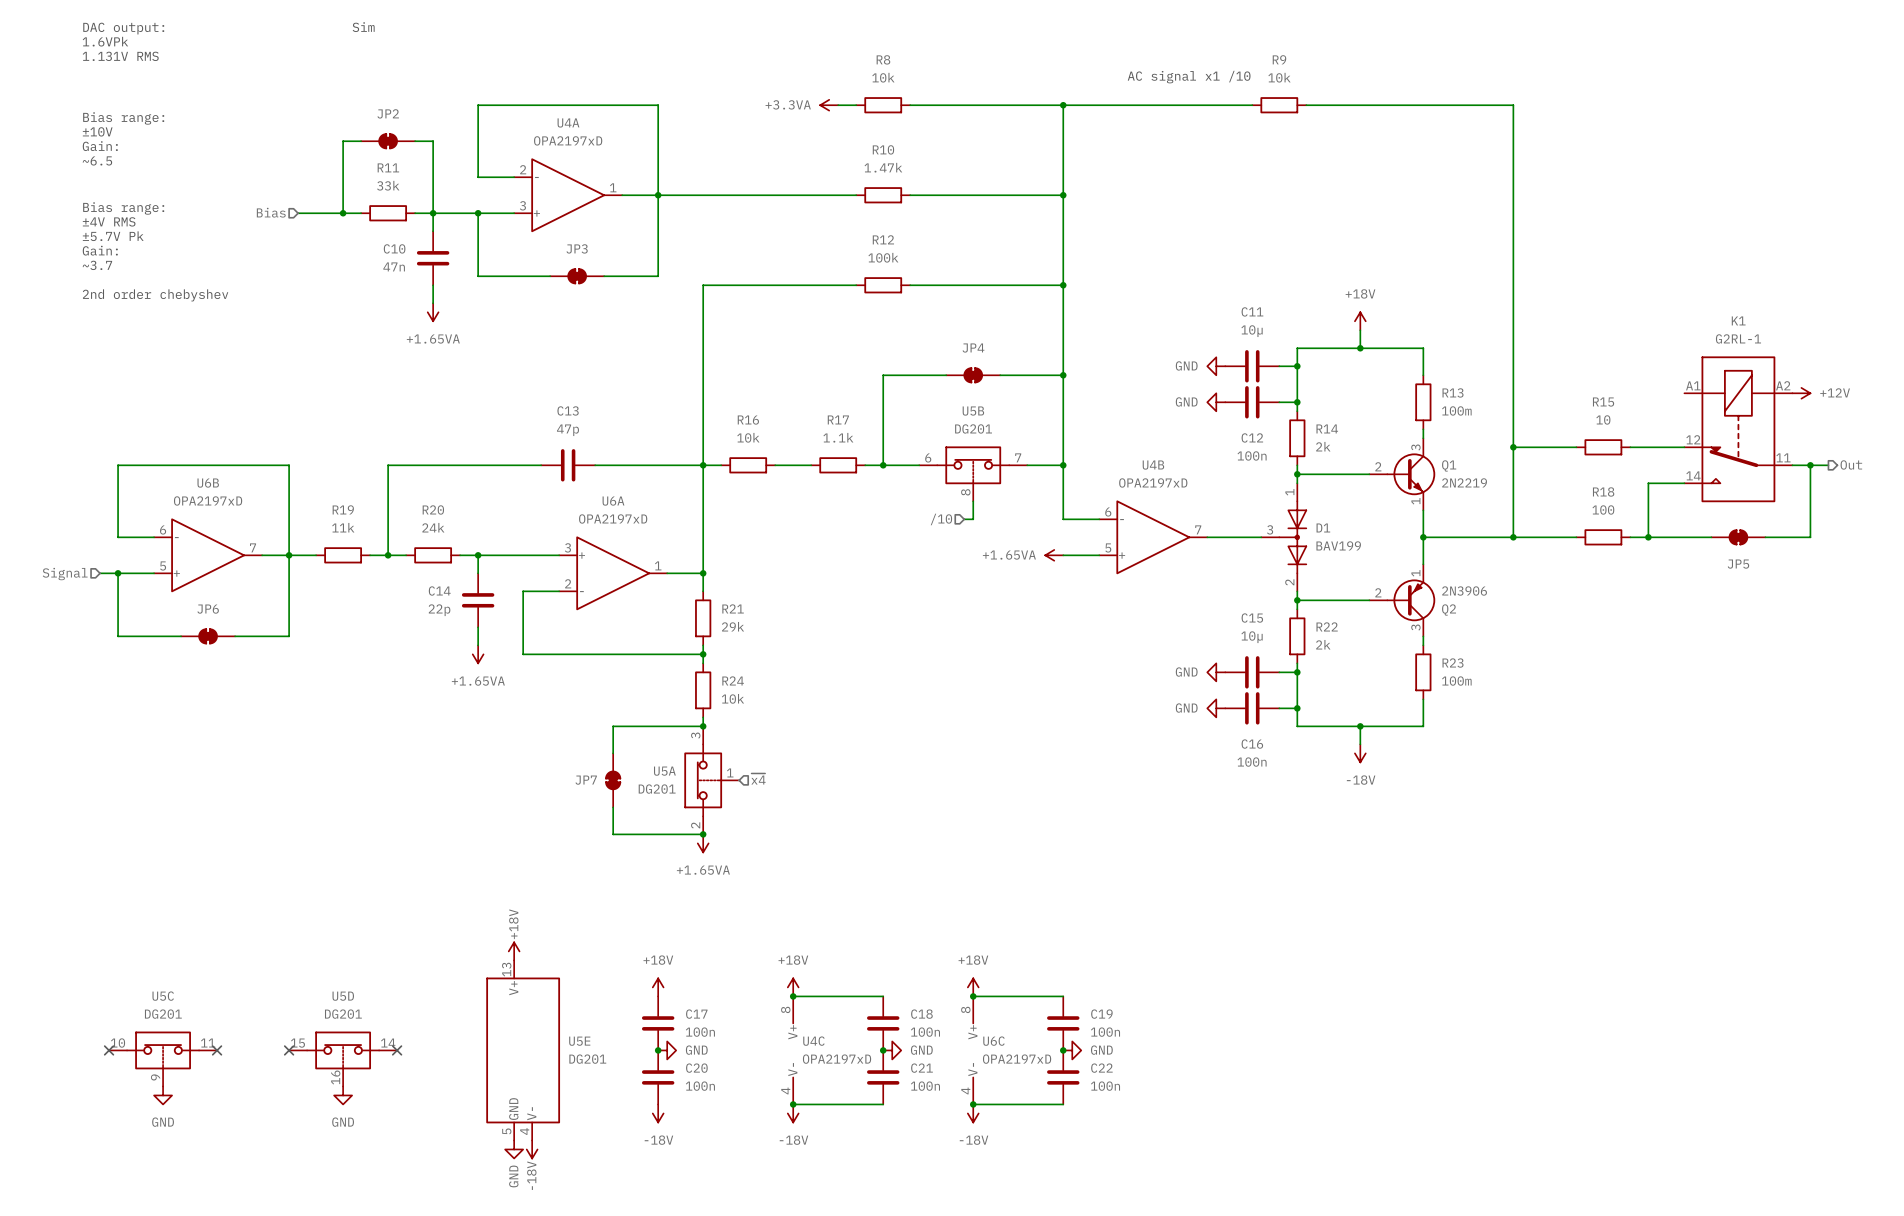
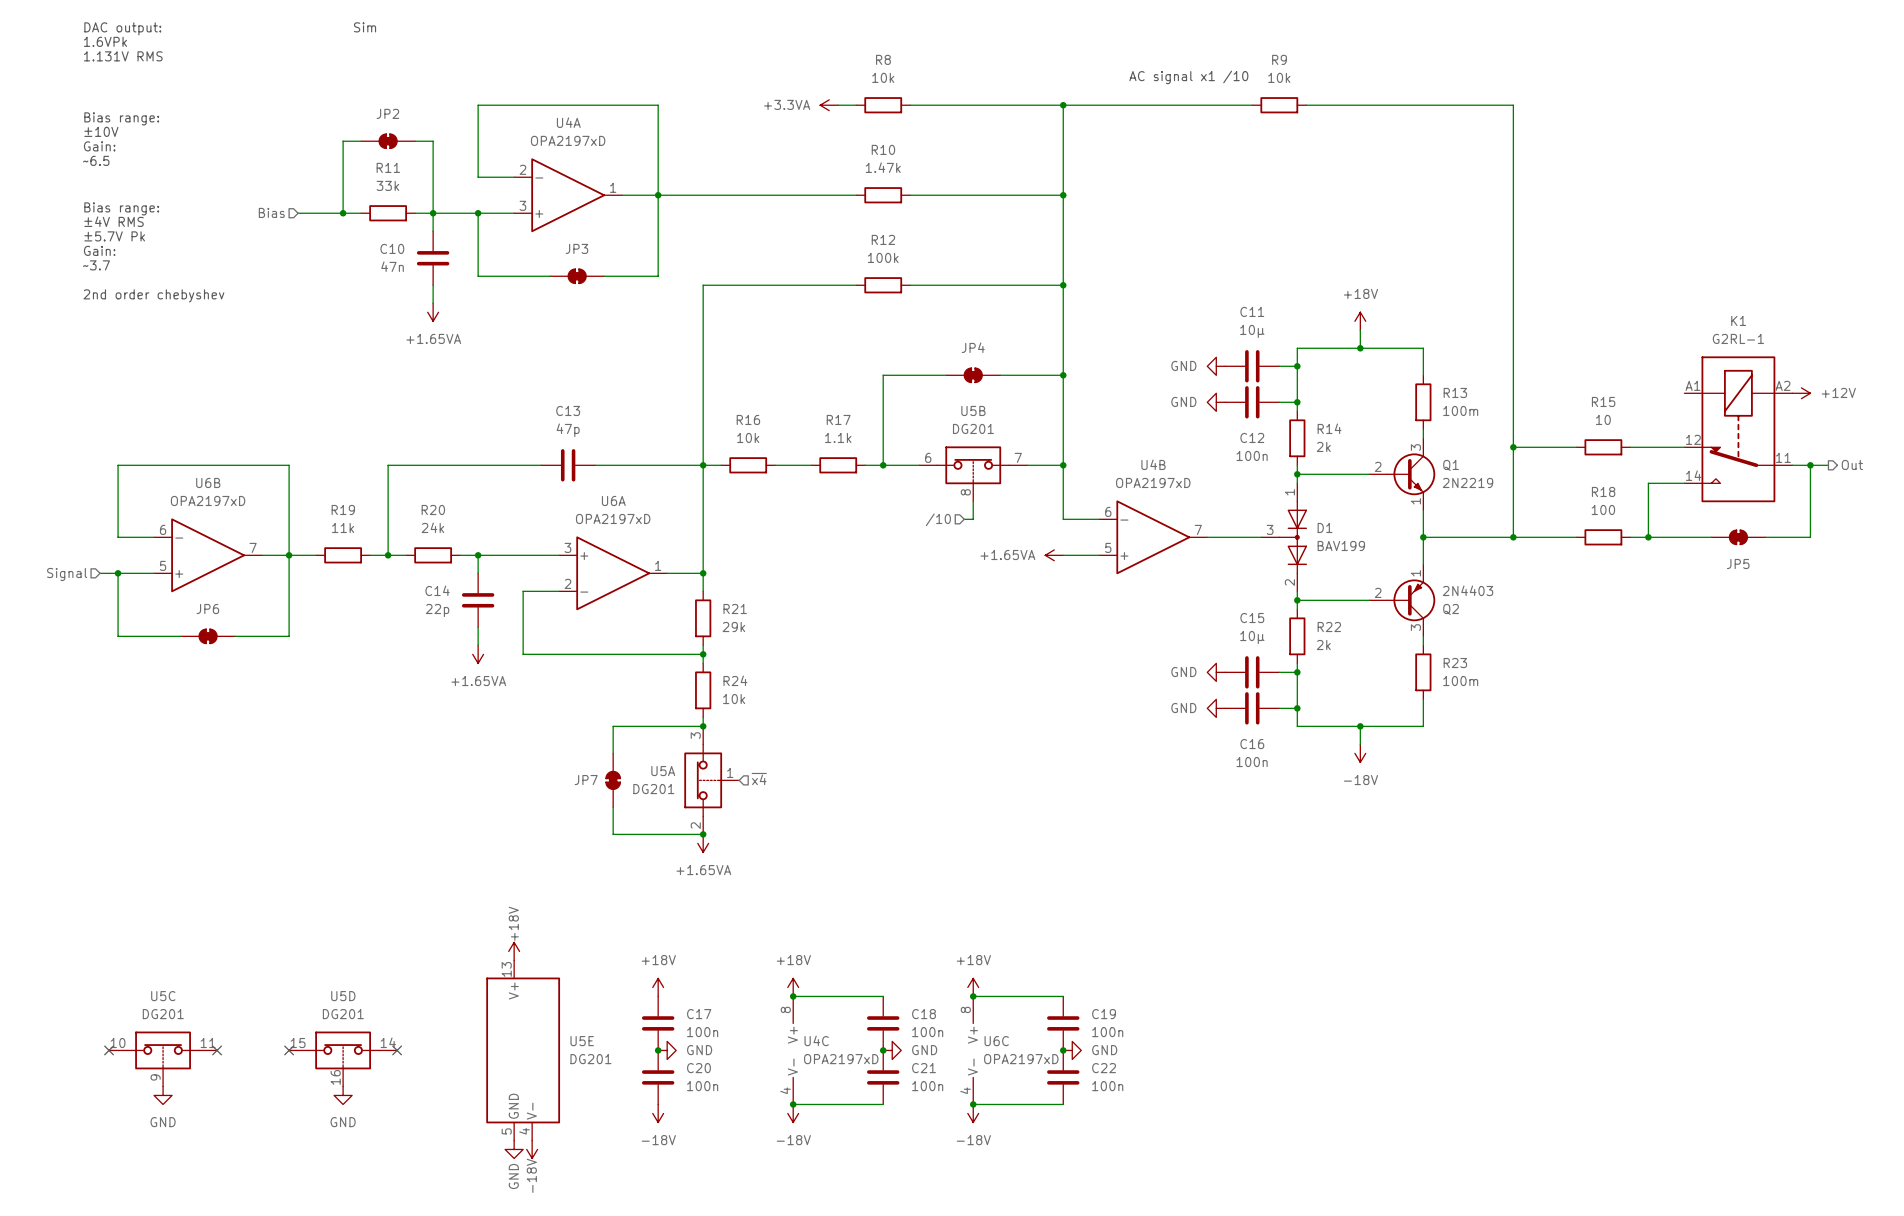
Q2 value: 2N3906 (1464, 591) -> 2N4403 (1467, 590)

